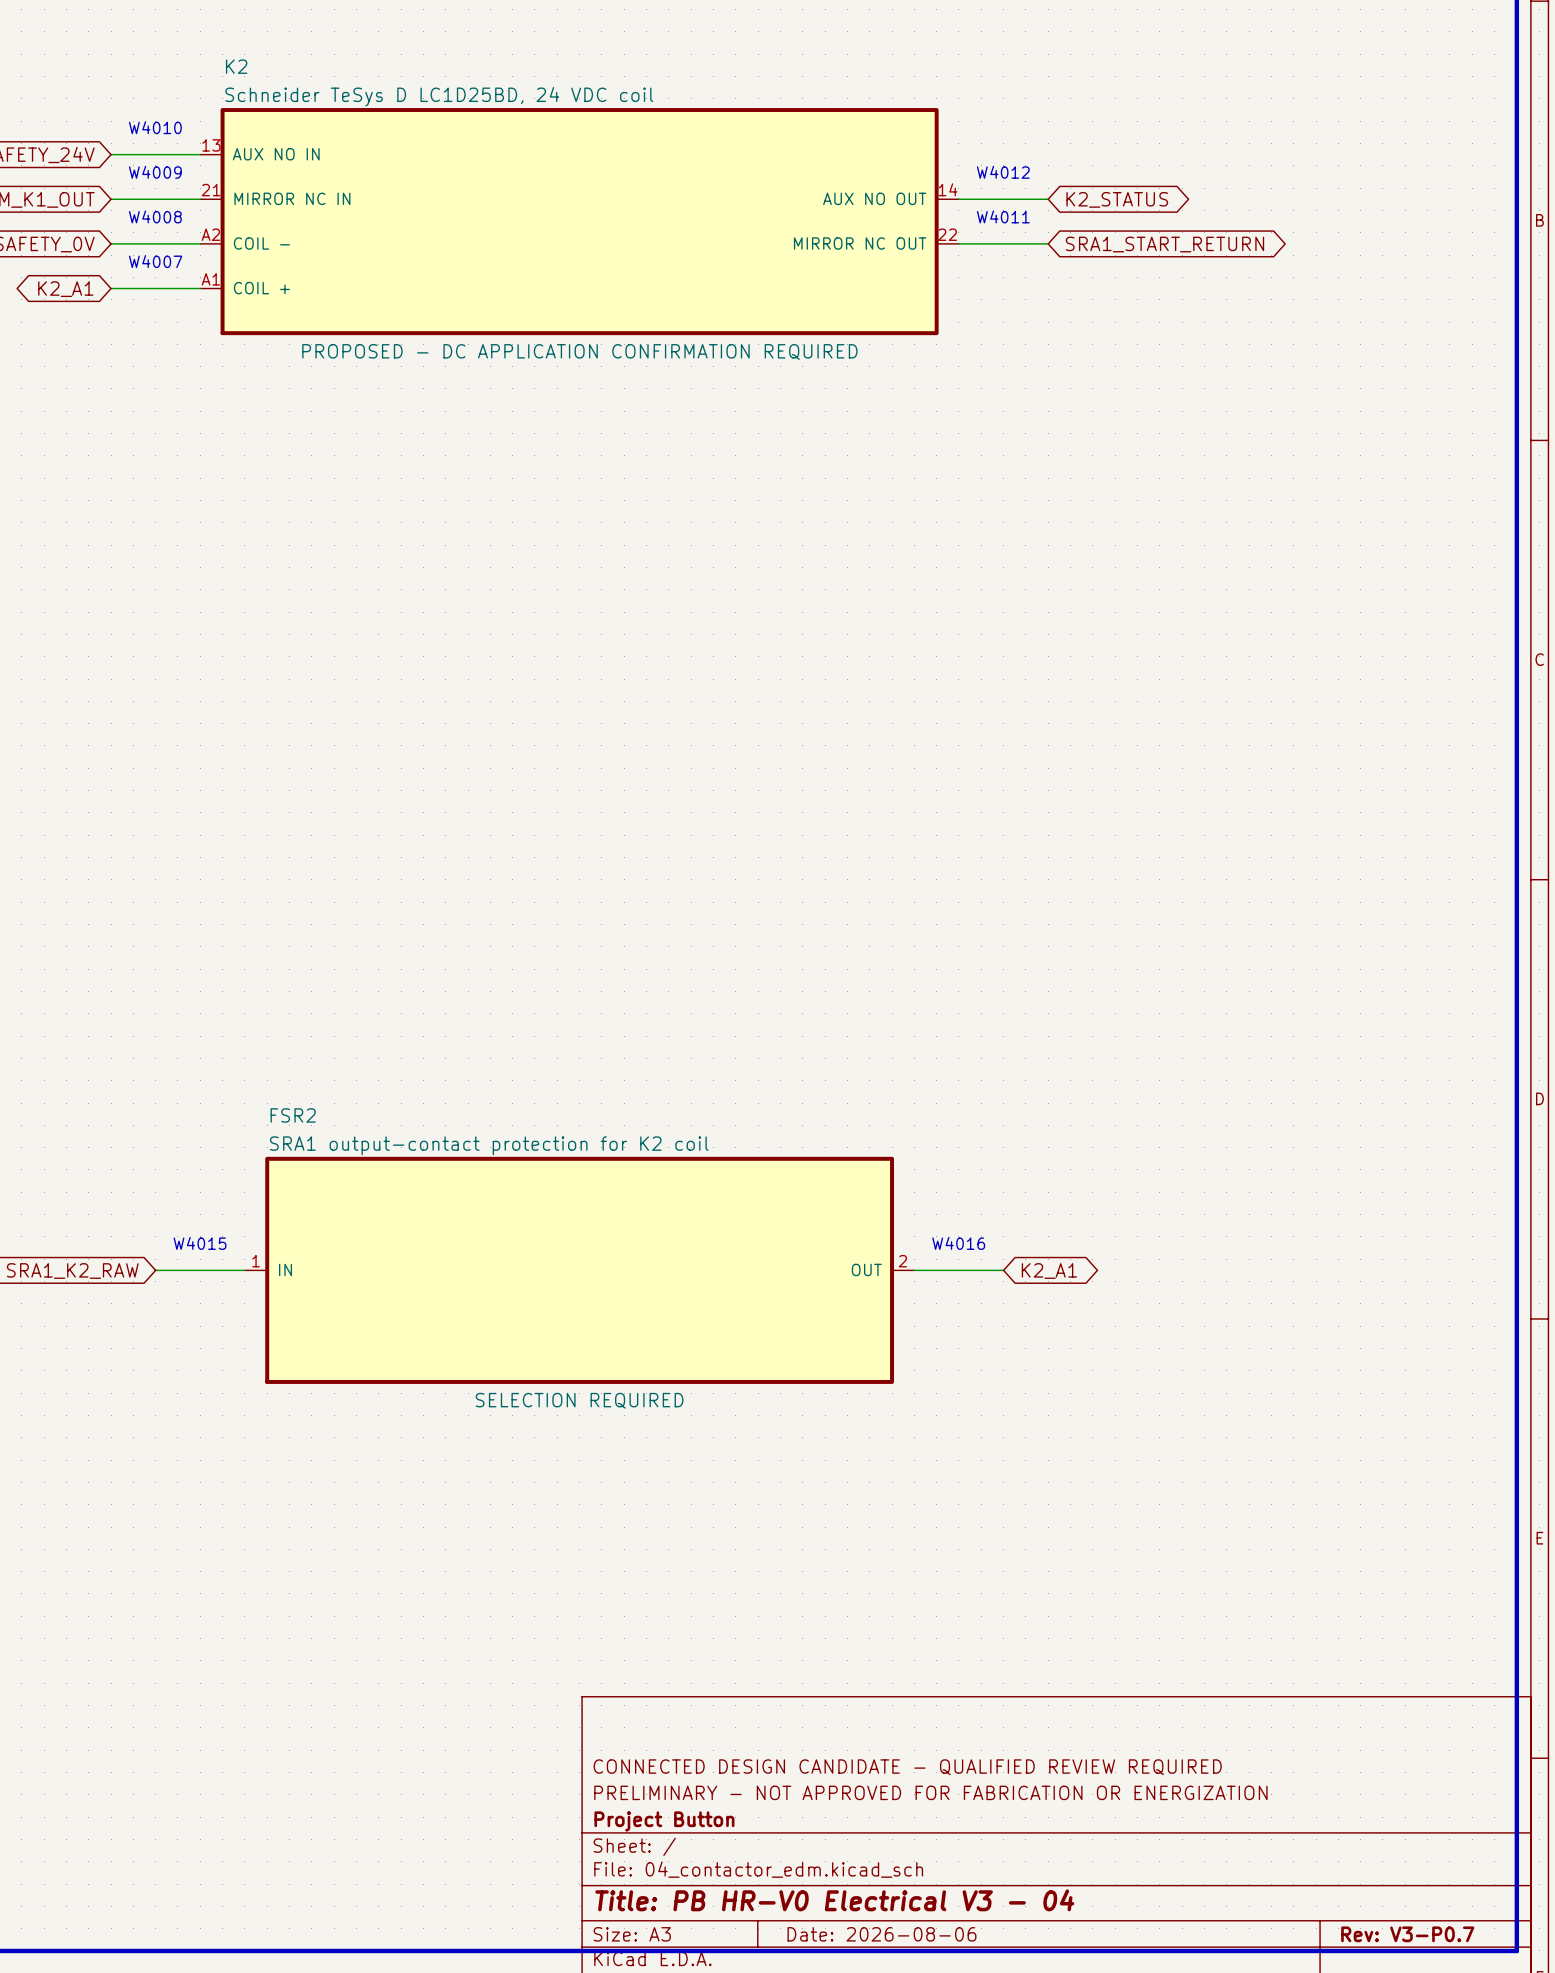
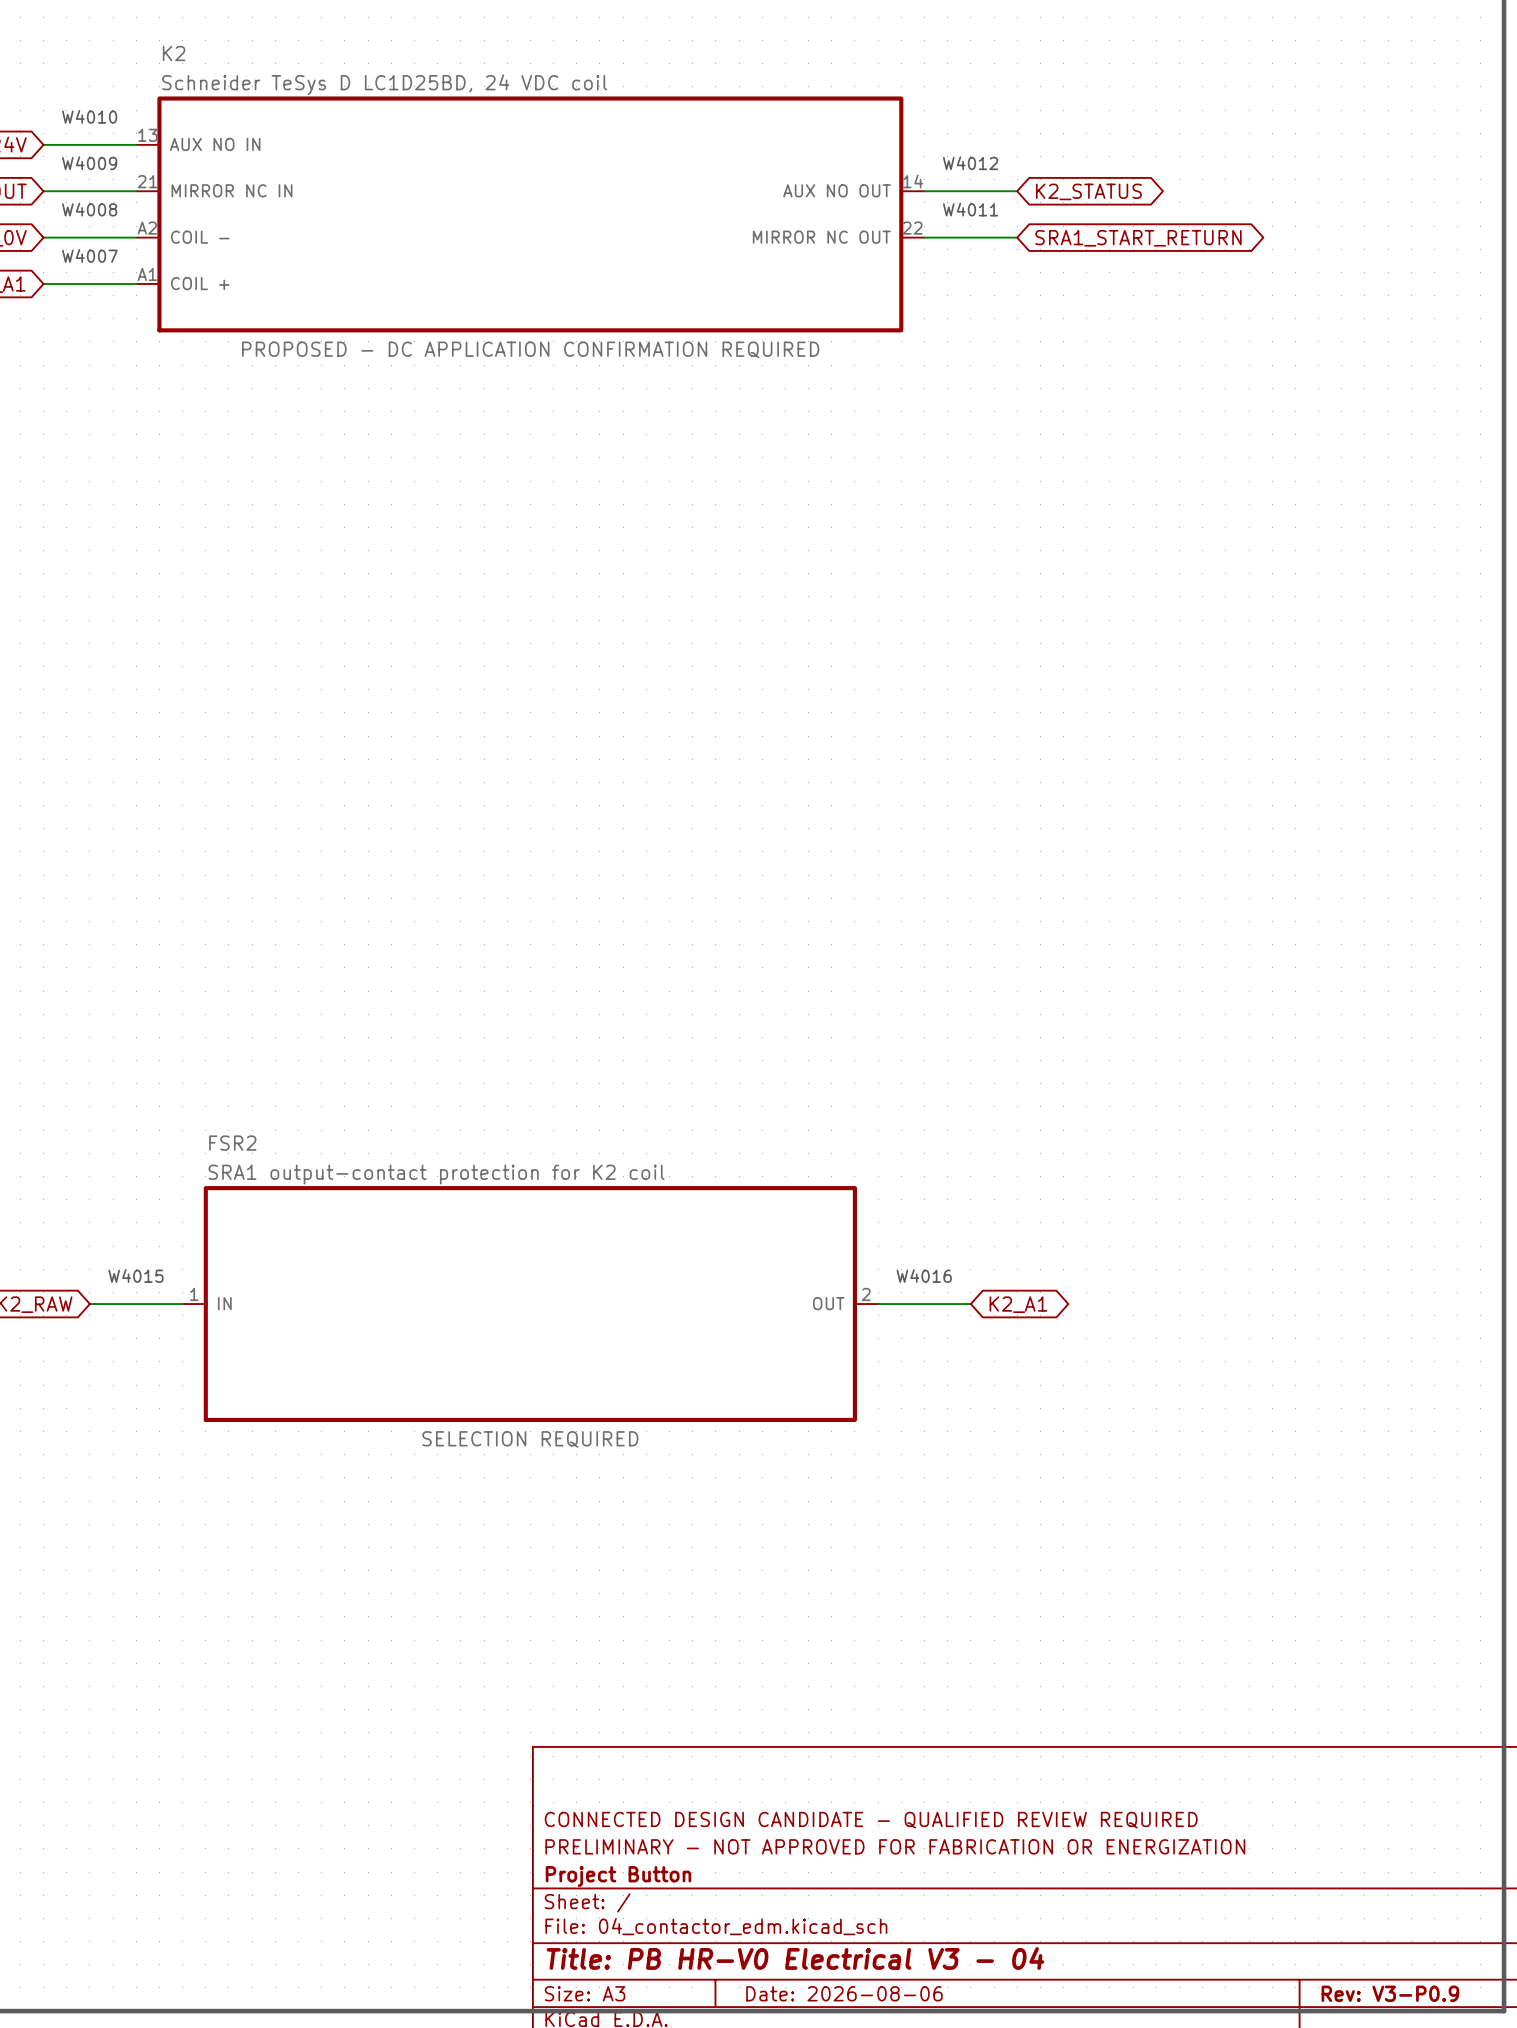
title block: Rev: V3-P0.7 (1407, 1934) -> Rev: V3-P0.9 (1390, 1993)

